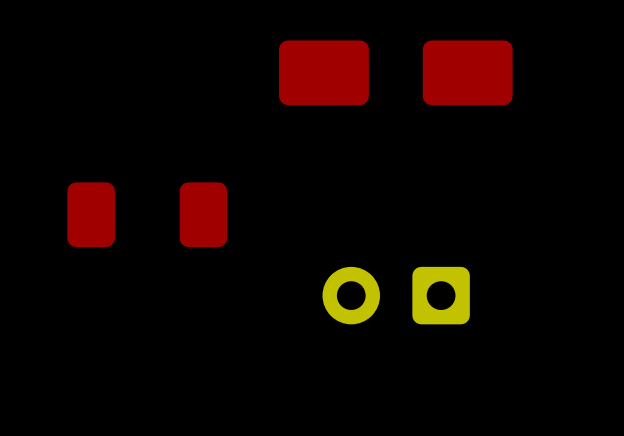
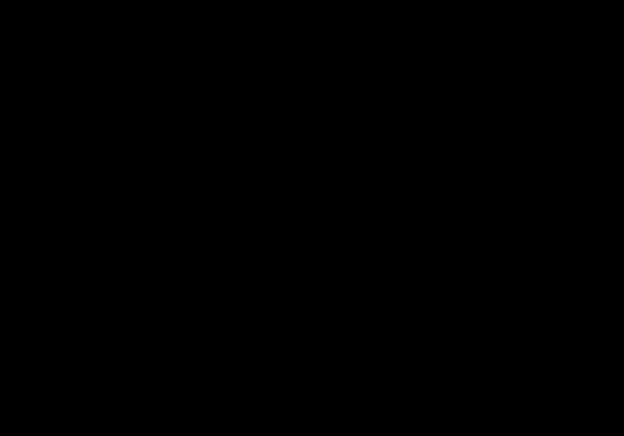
part: (395, 72) -> none
part: (147, 214) -> none
part: (396, 295) -> none

